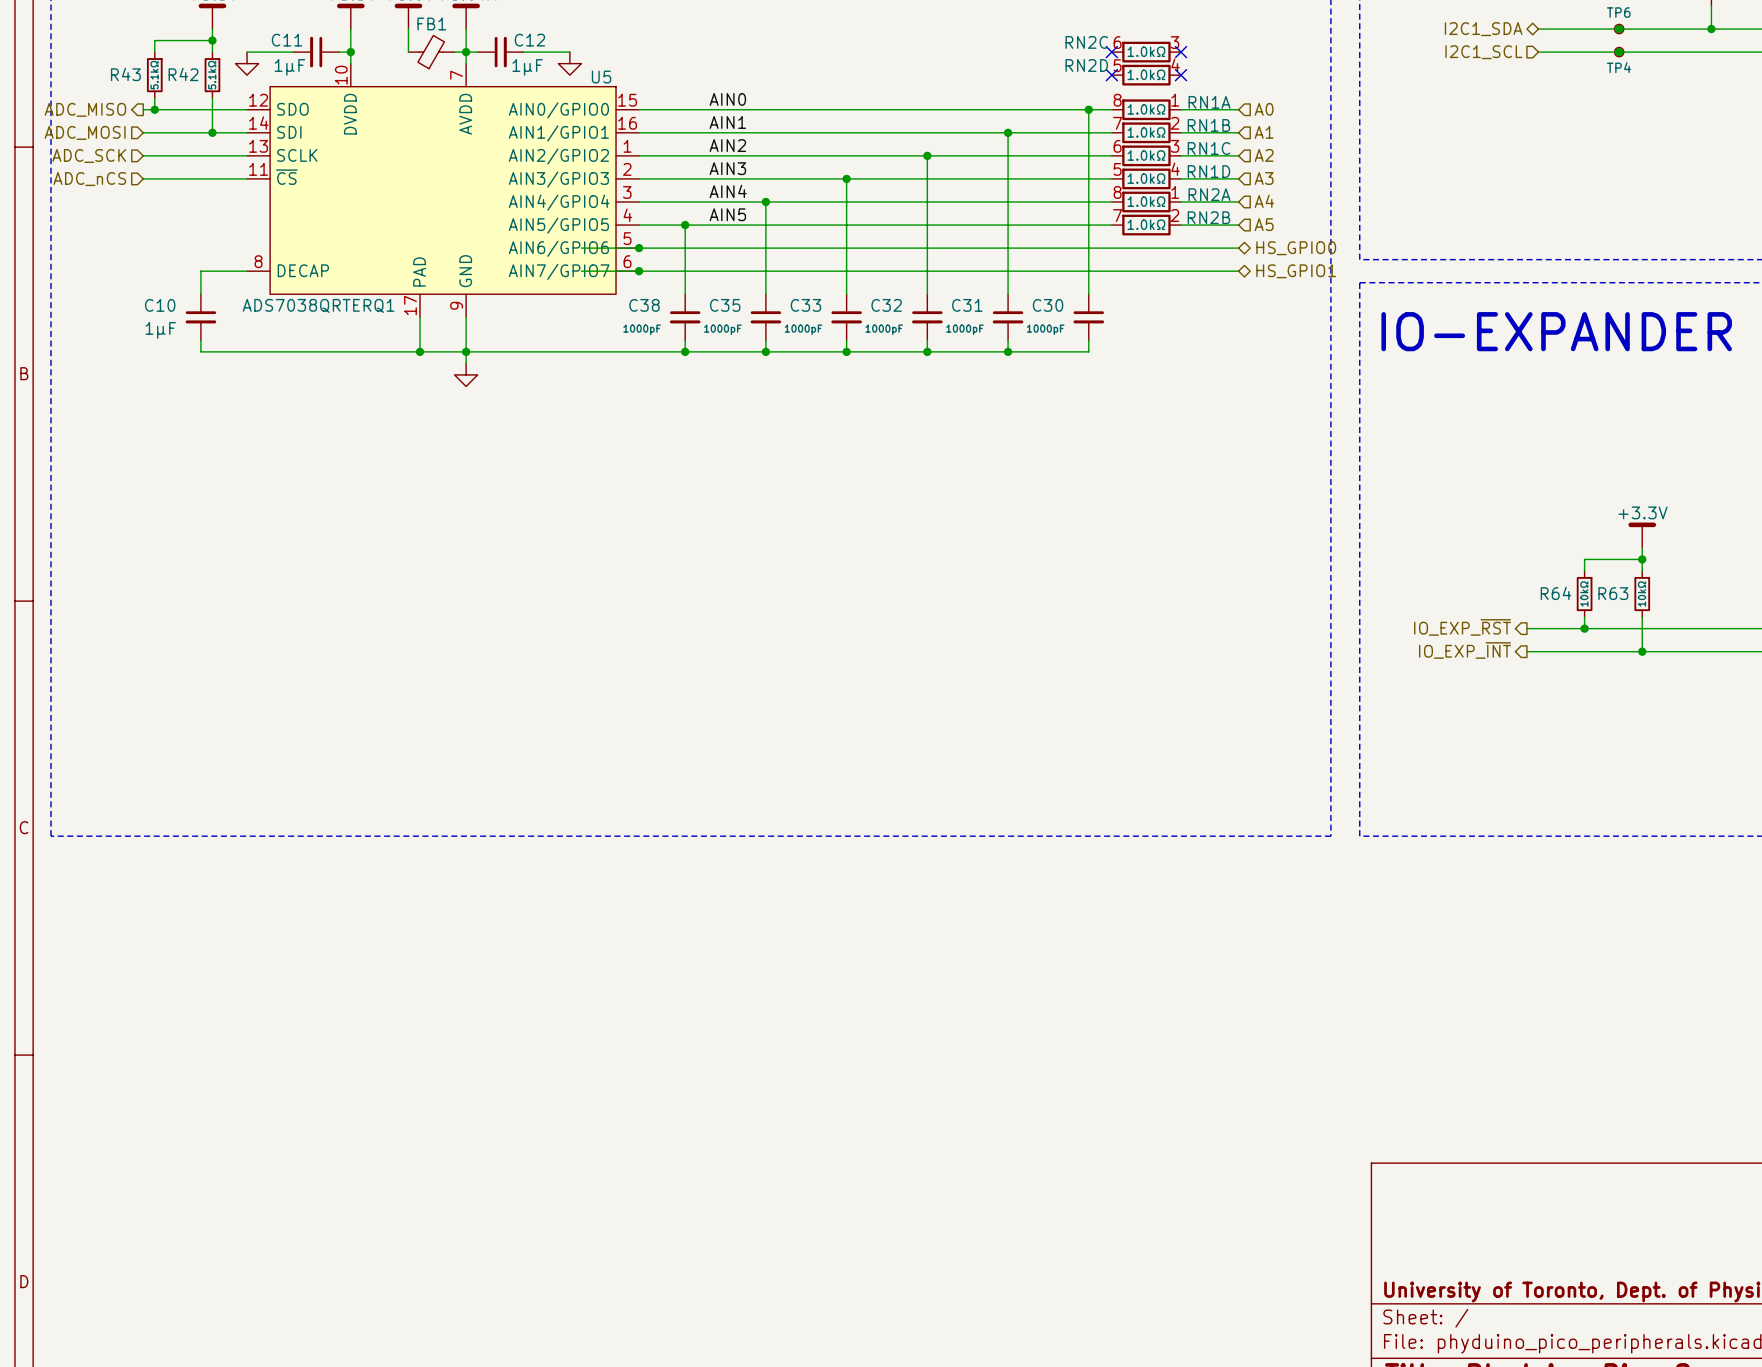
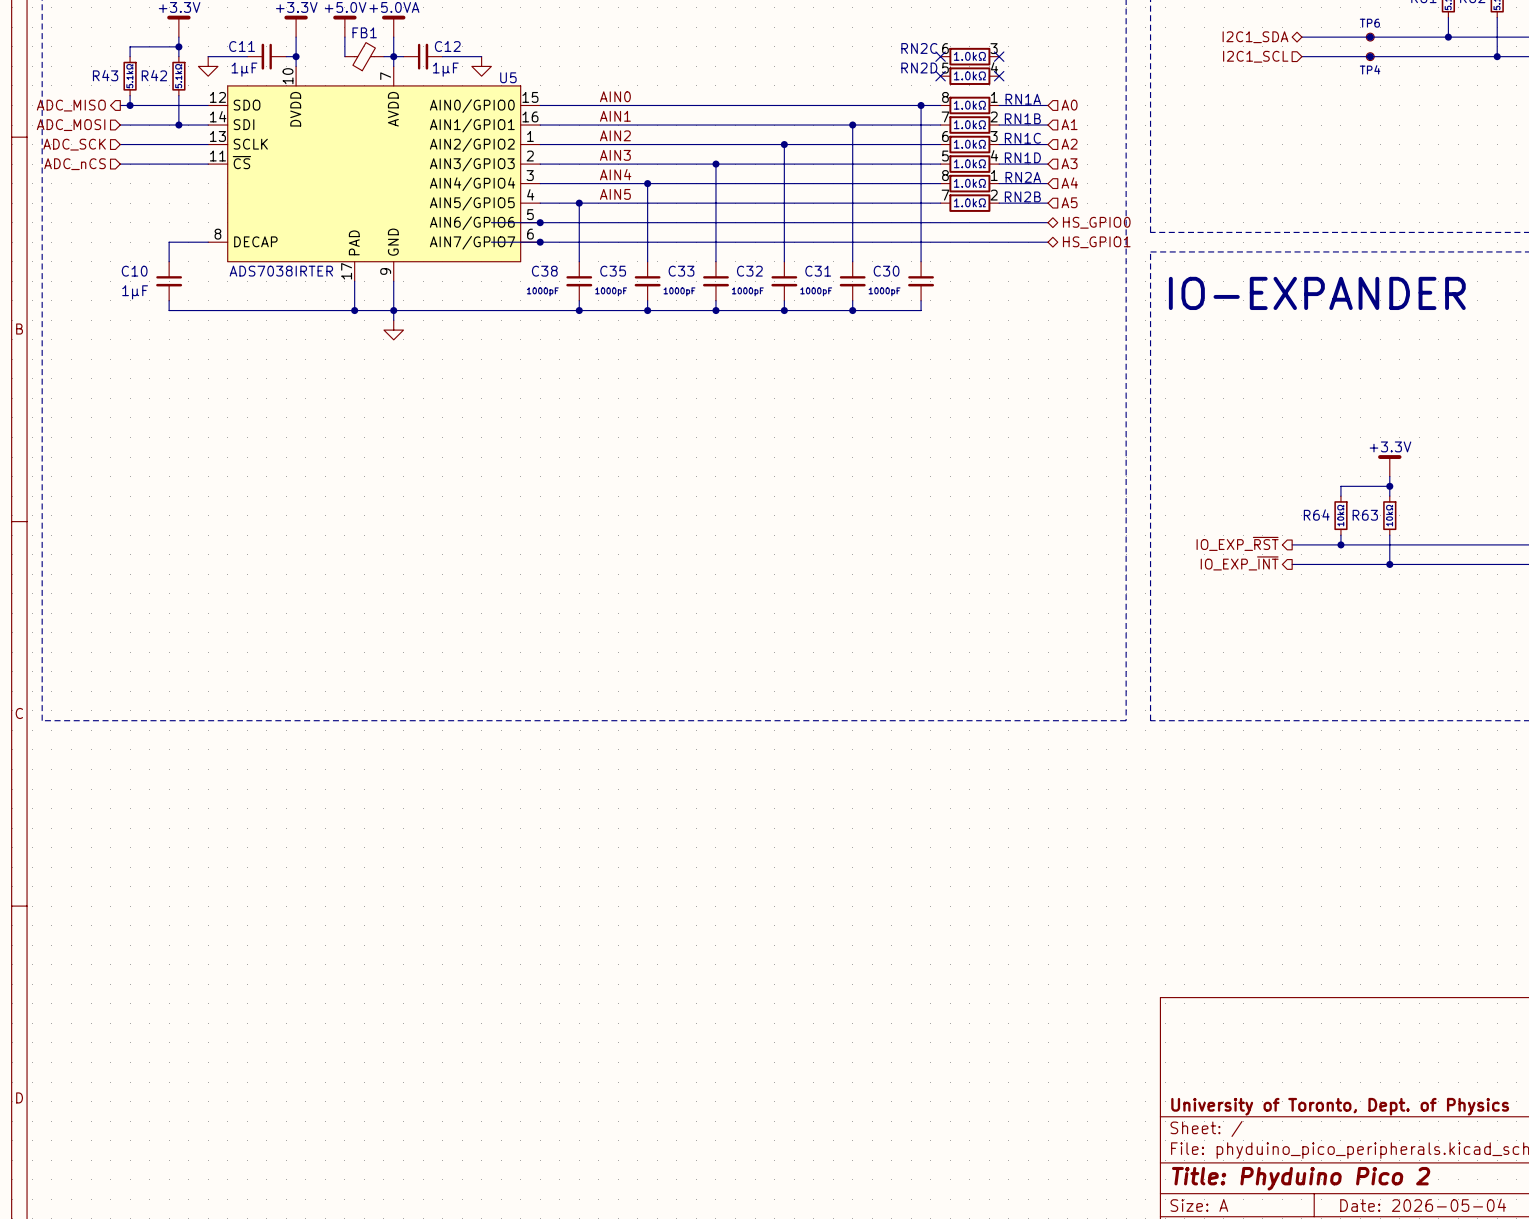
U5 value: ADS7038QRTERQ1 (318, 305) -> ADS7038IRTER (281, 271)

